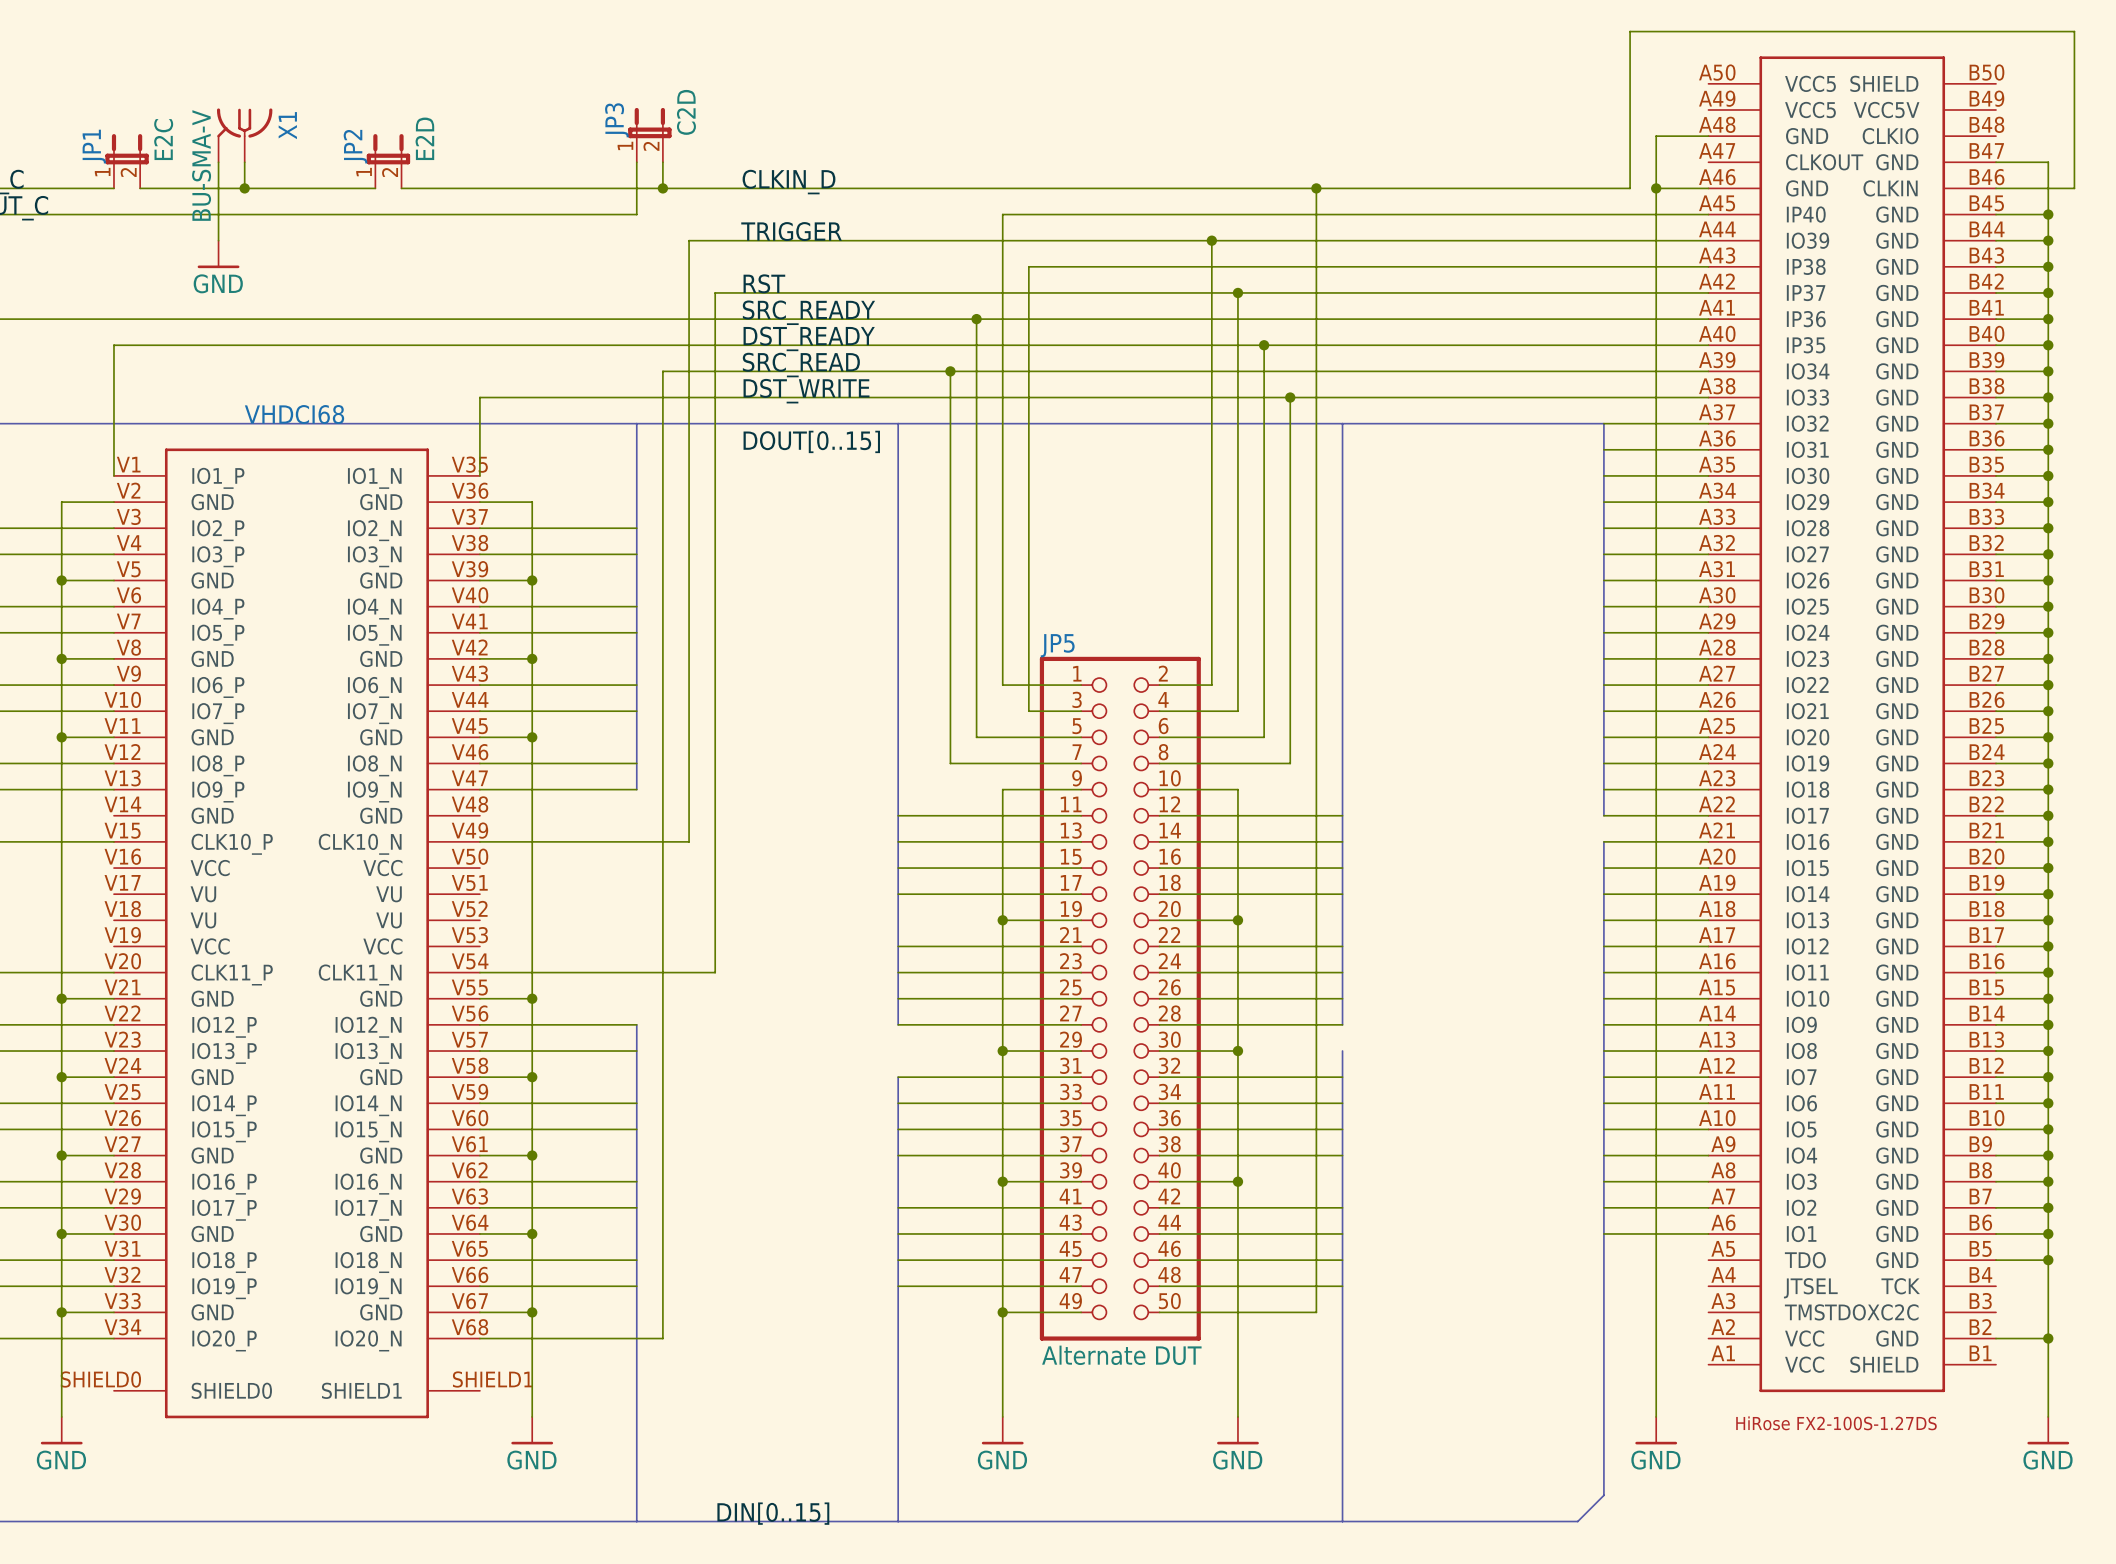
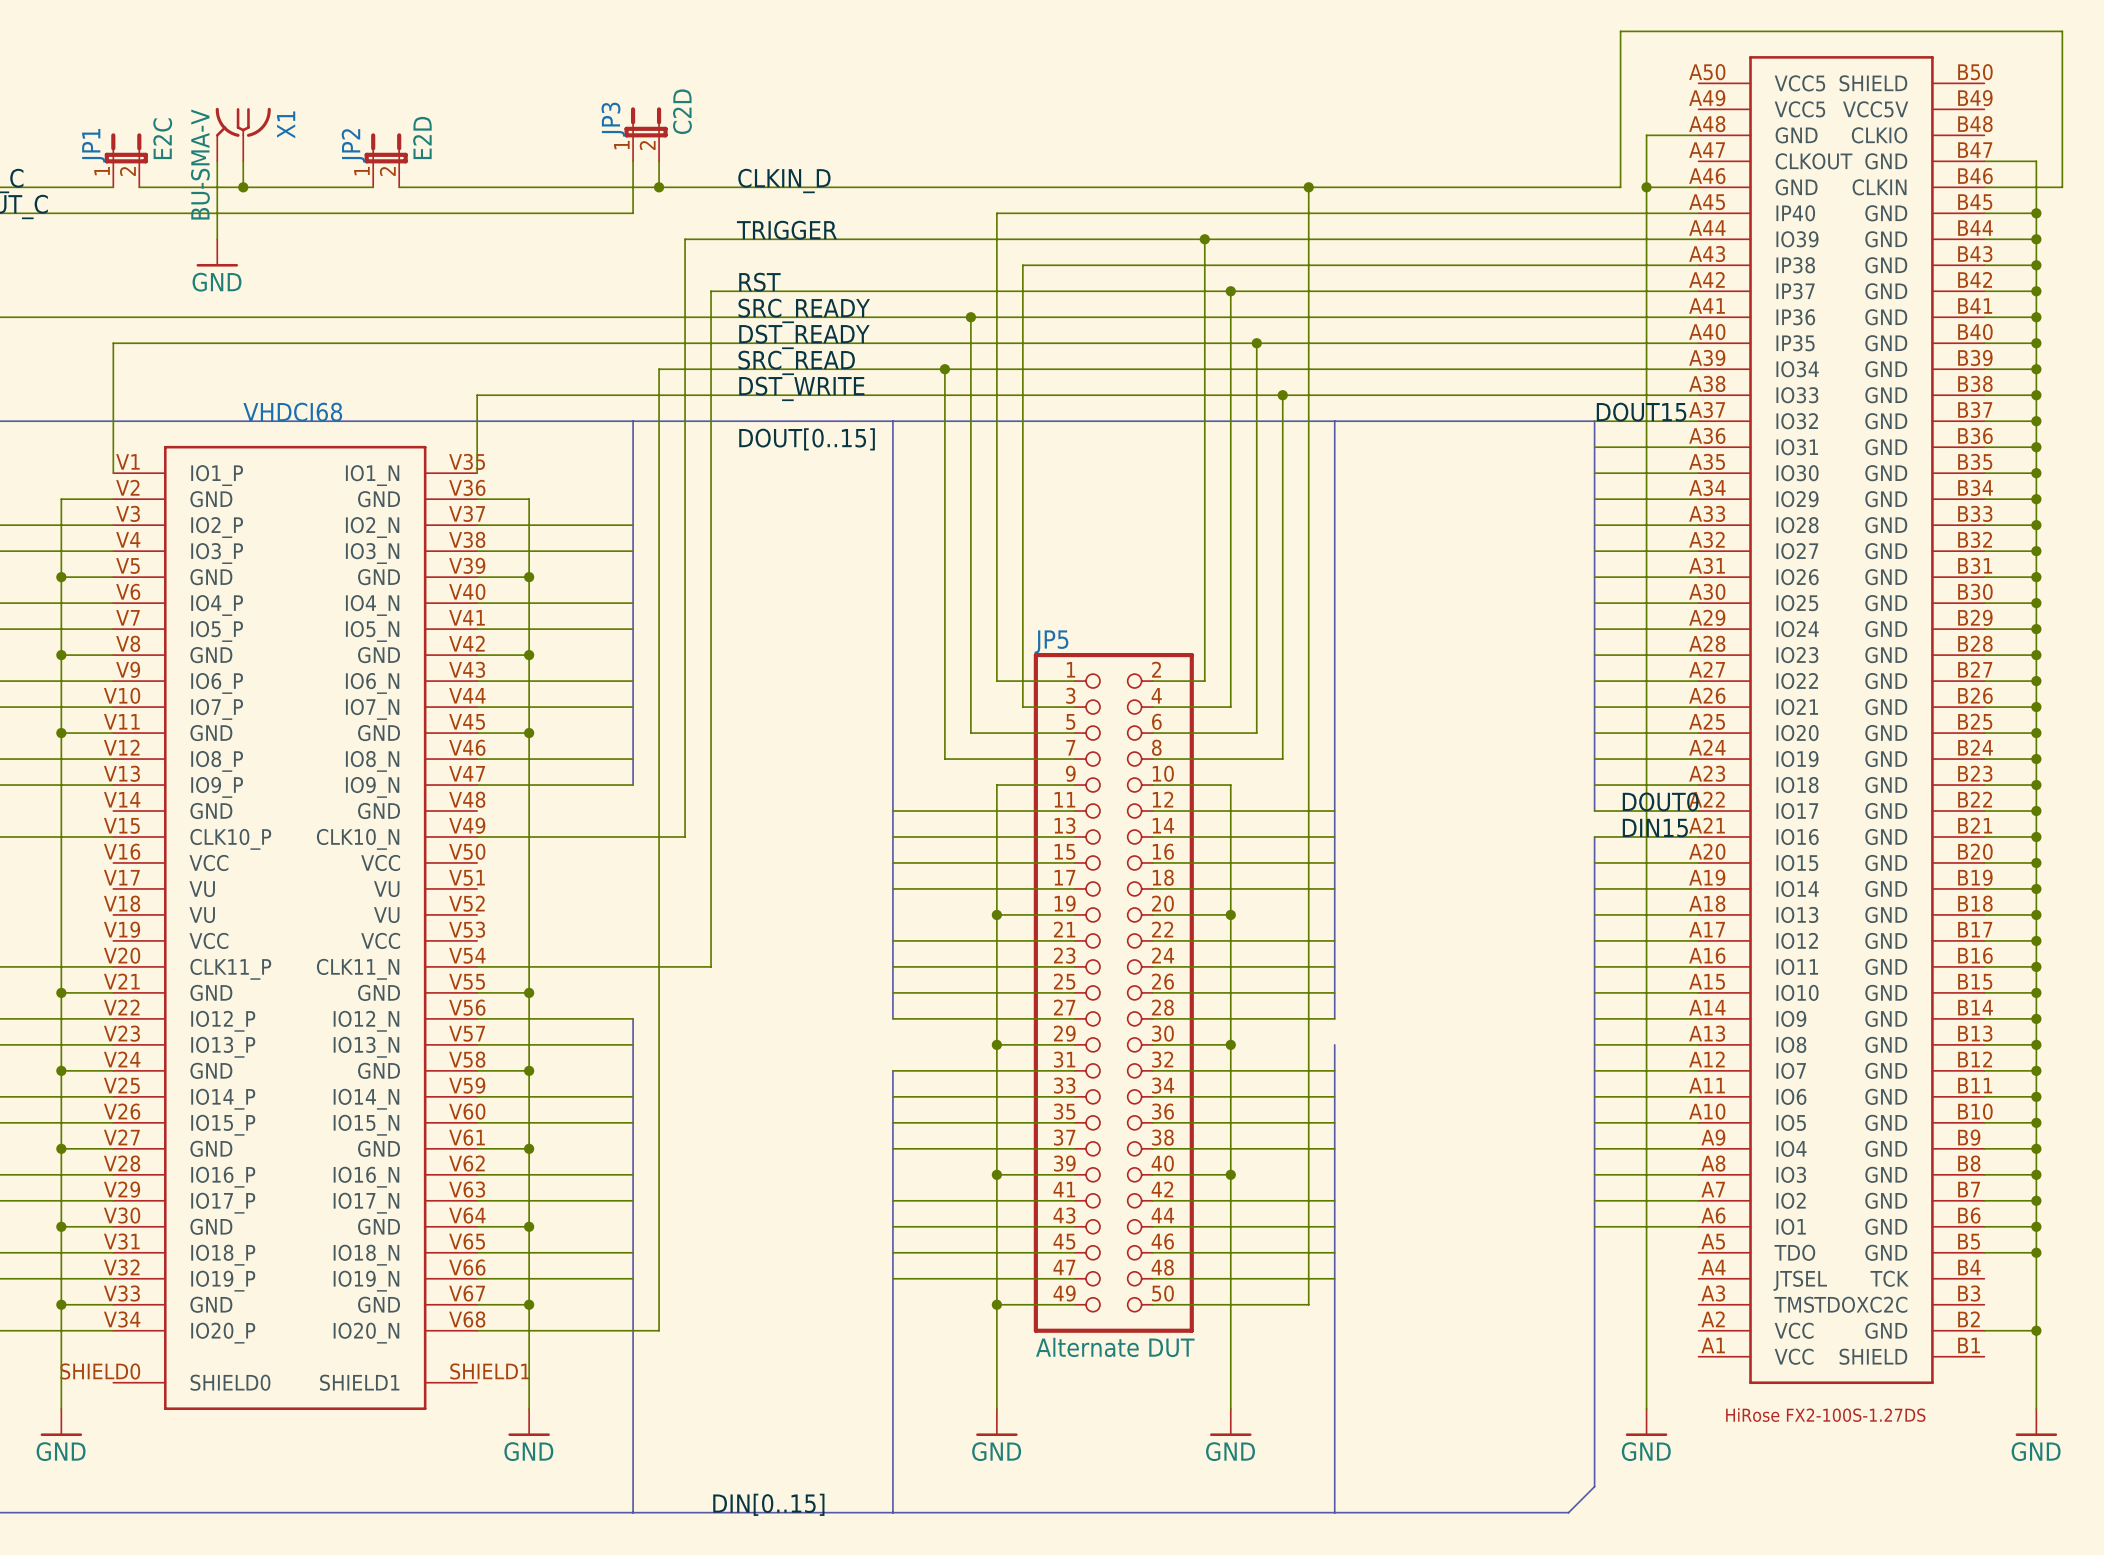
label: none -> DOUT15 (1641, 412)
label: none -> DOUT0 (1660, 801)
label: none -> DIN15 (1655, 828)

